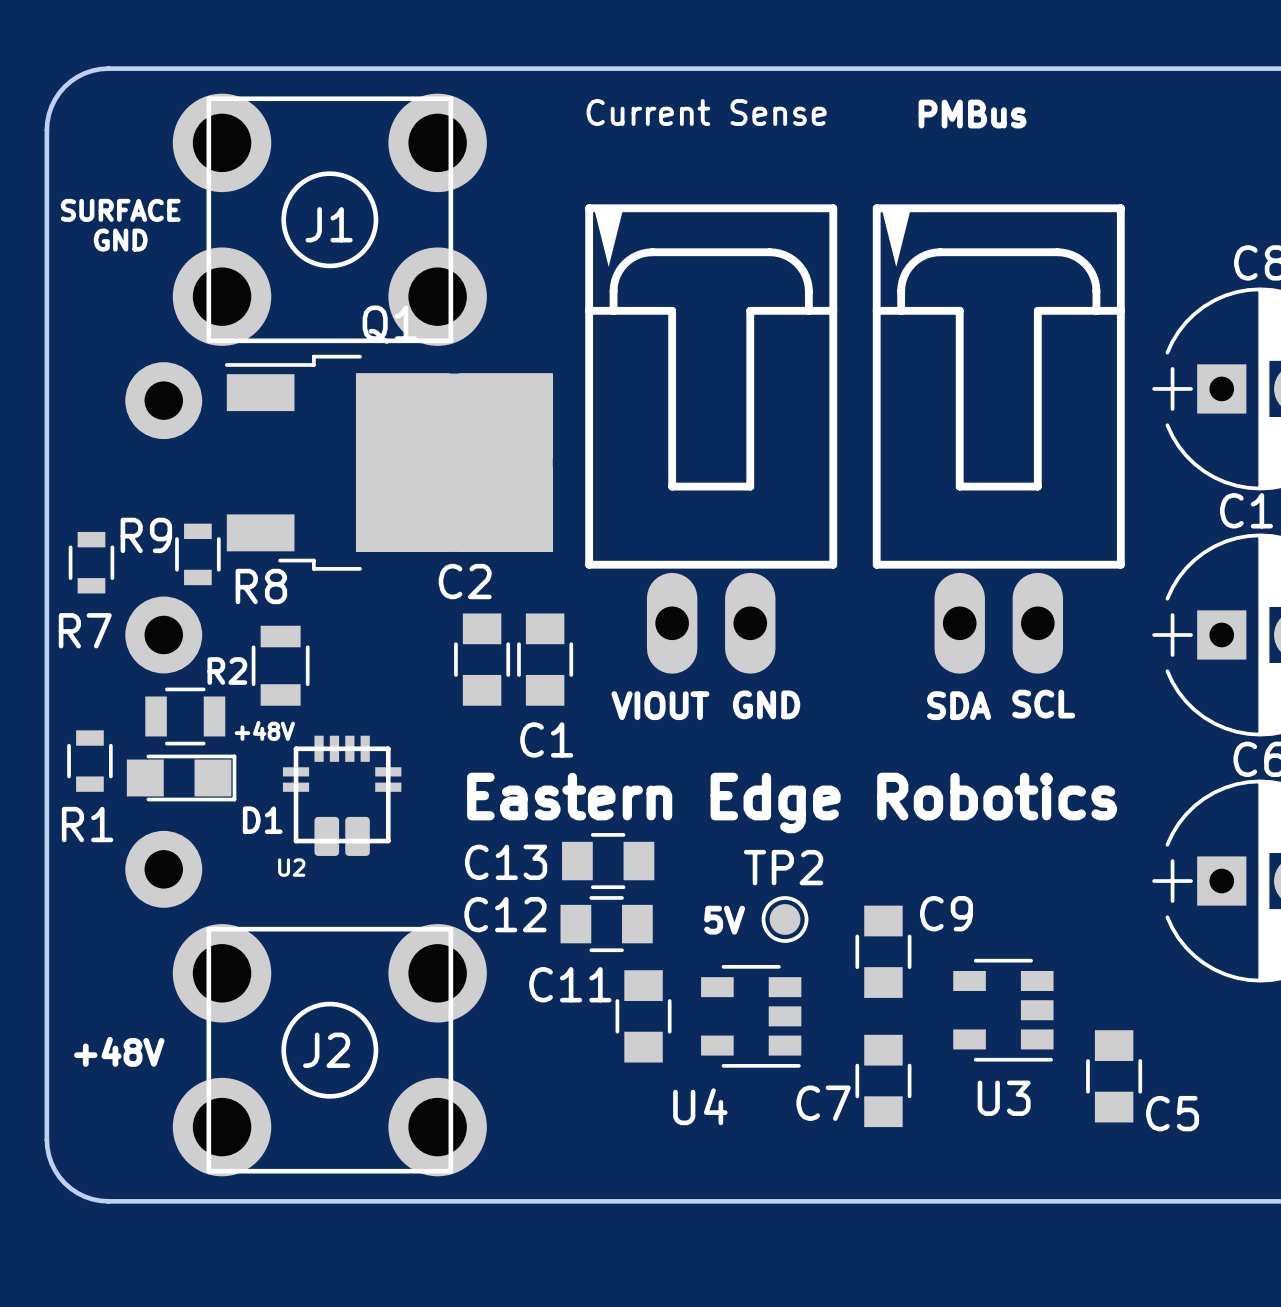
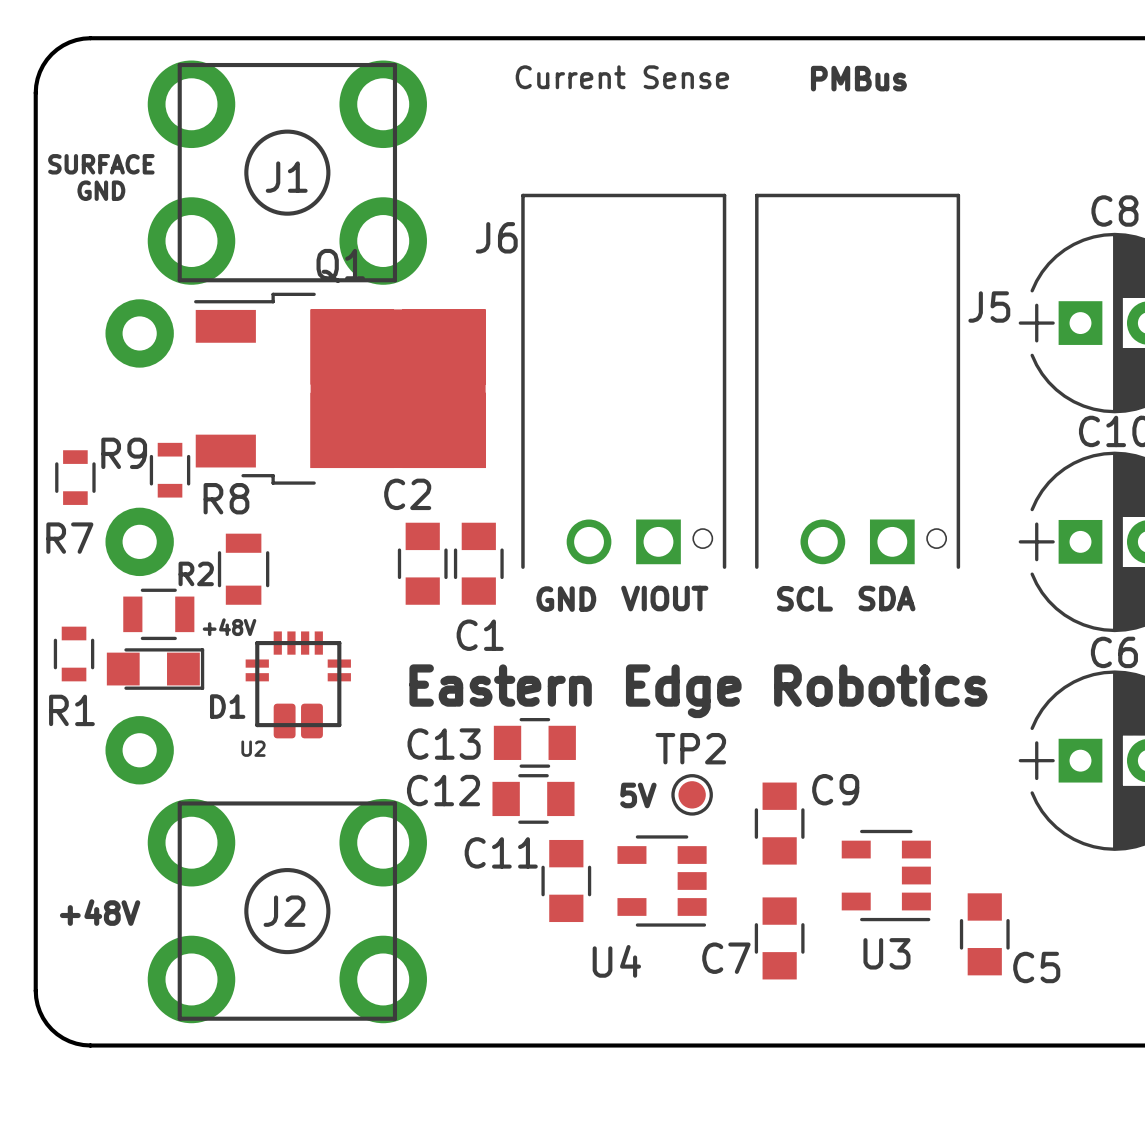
part: (711, 439) -> none
part: (998, 439) -> none
J6: none -> (623, 381)
J5: none -> (857, 381)
text: GND (766, 704) -> VIOUT (664, 598)
text position: SCL (1043, 704) -> SCL (804, 598)
text: VIOUT (660, 705) -> GND (566, 599)
text position: SDA (959, 705) -> SDA (887, 598)

